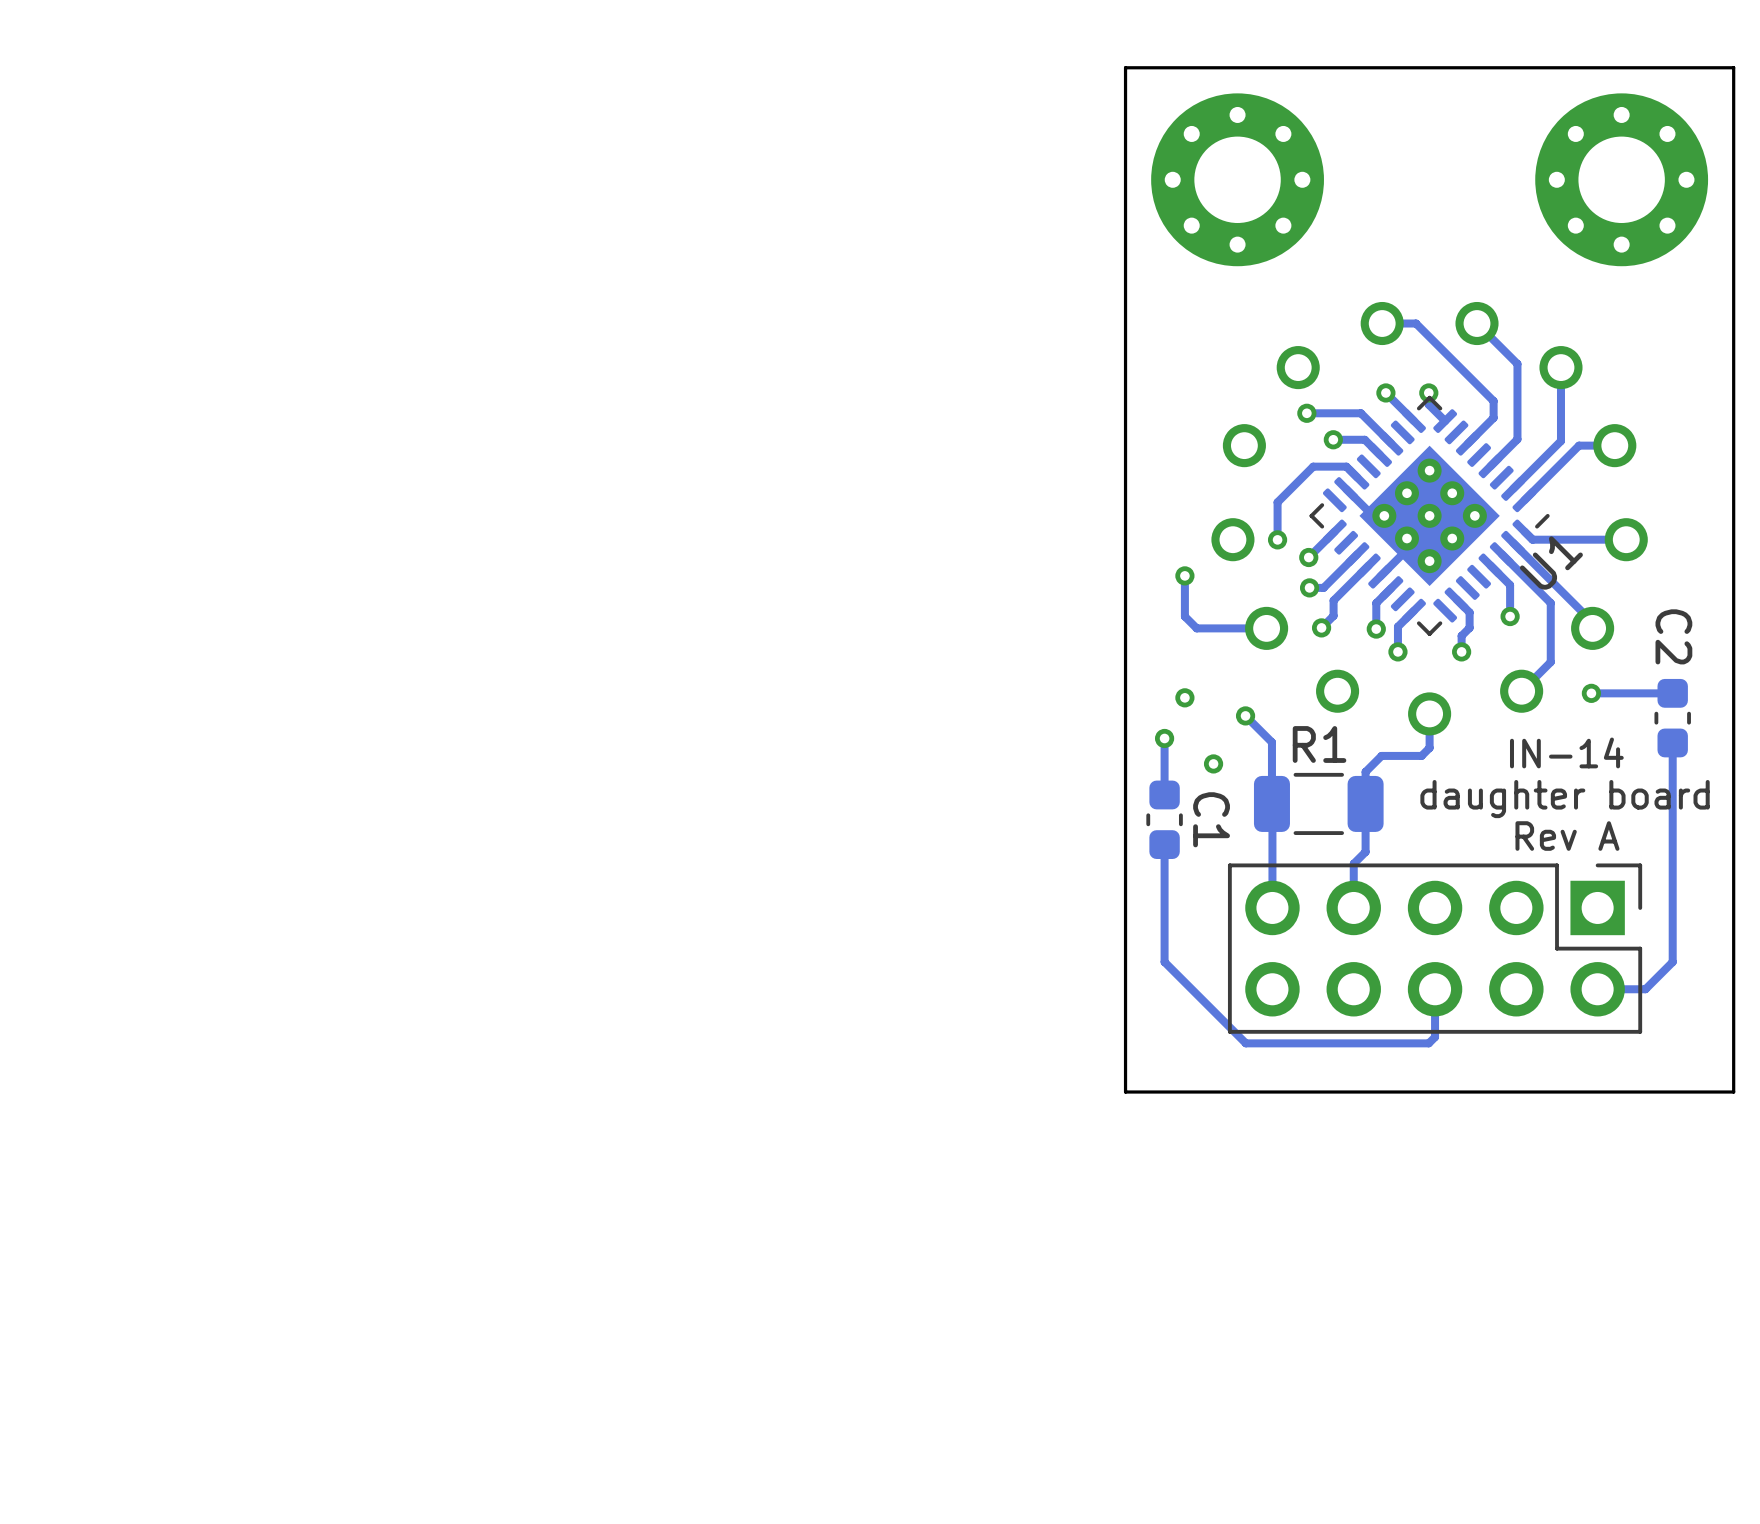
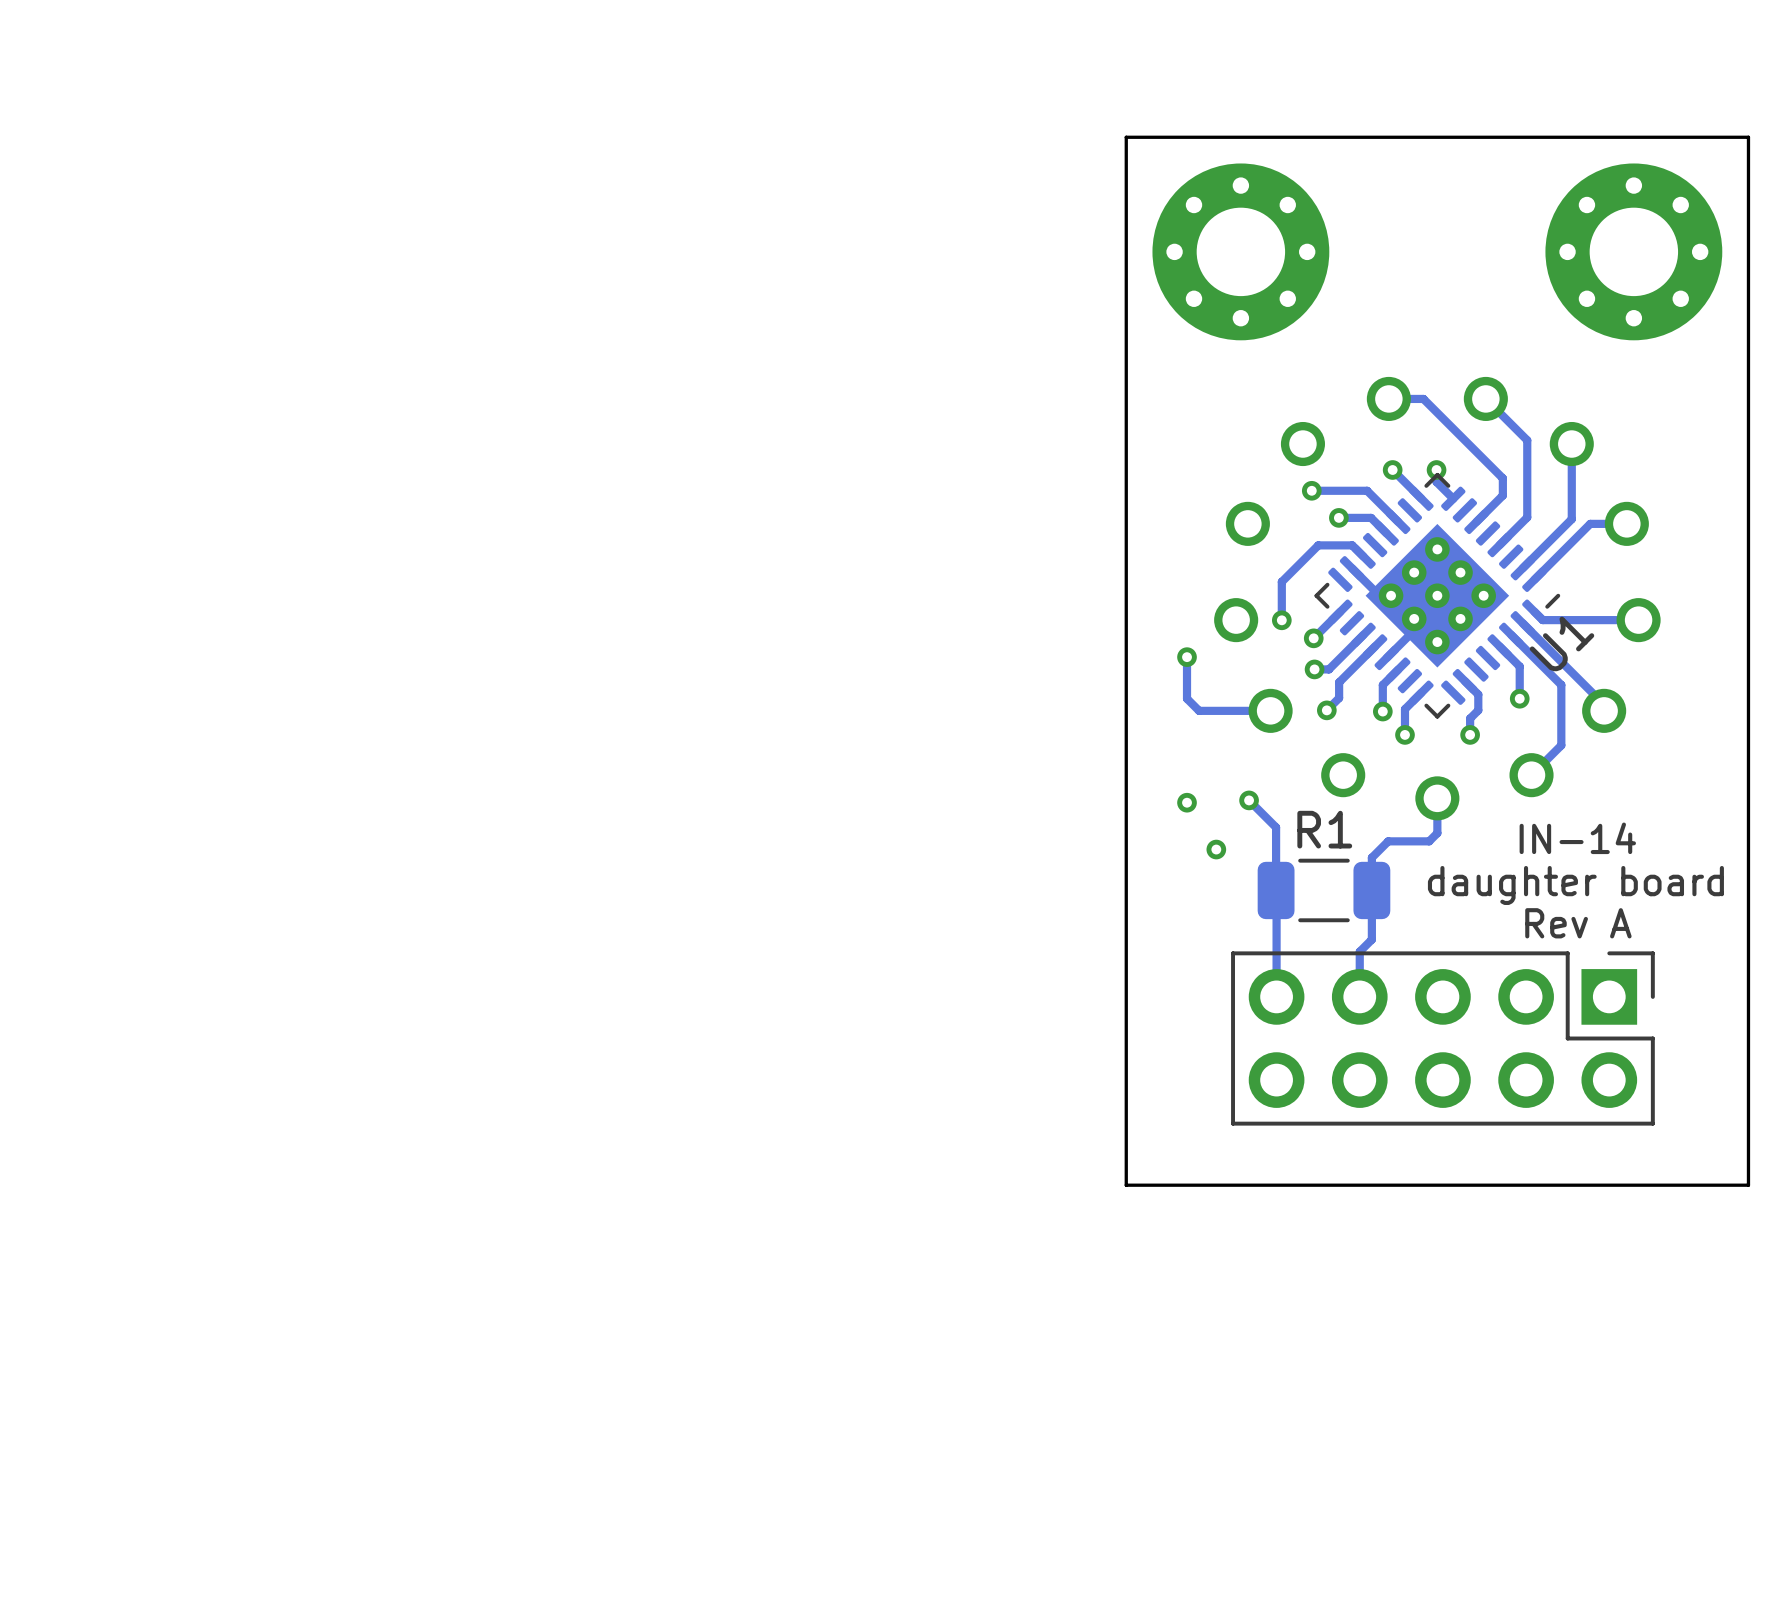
via: (1591, 693) -> none
track: (1672, 693) (1591, 693) -> none
via: (1184, 697) -> none
via: none -> (1187, 802)
C2: (1672, 718) -> none
track: (1164, 738) (1164, 794) -> none
via: (1164, 738) -> none
track: (1672, 742) (1672, 962) (1645, 989) (1597, 989) -> none
C1: (1164, 819) -> none
track: (1164, 844) (1164, 962) (1245, 1043) (1428, 1043) (1435, 1037) (1435, 989) -> none

